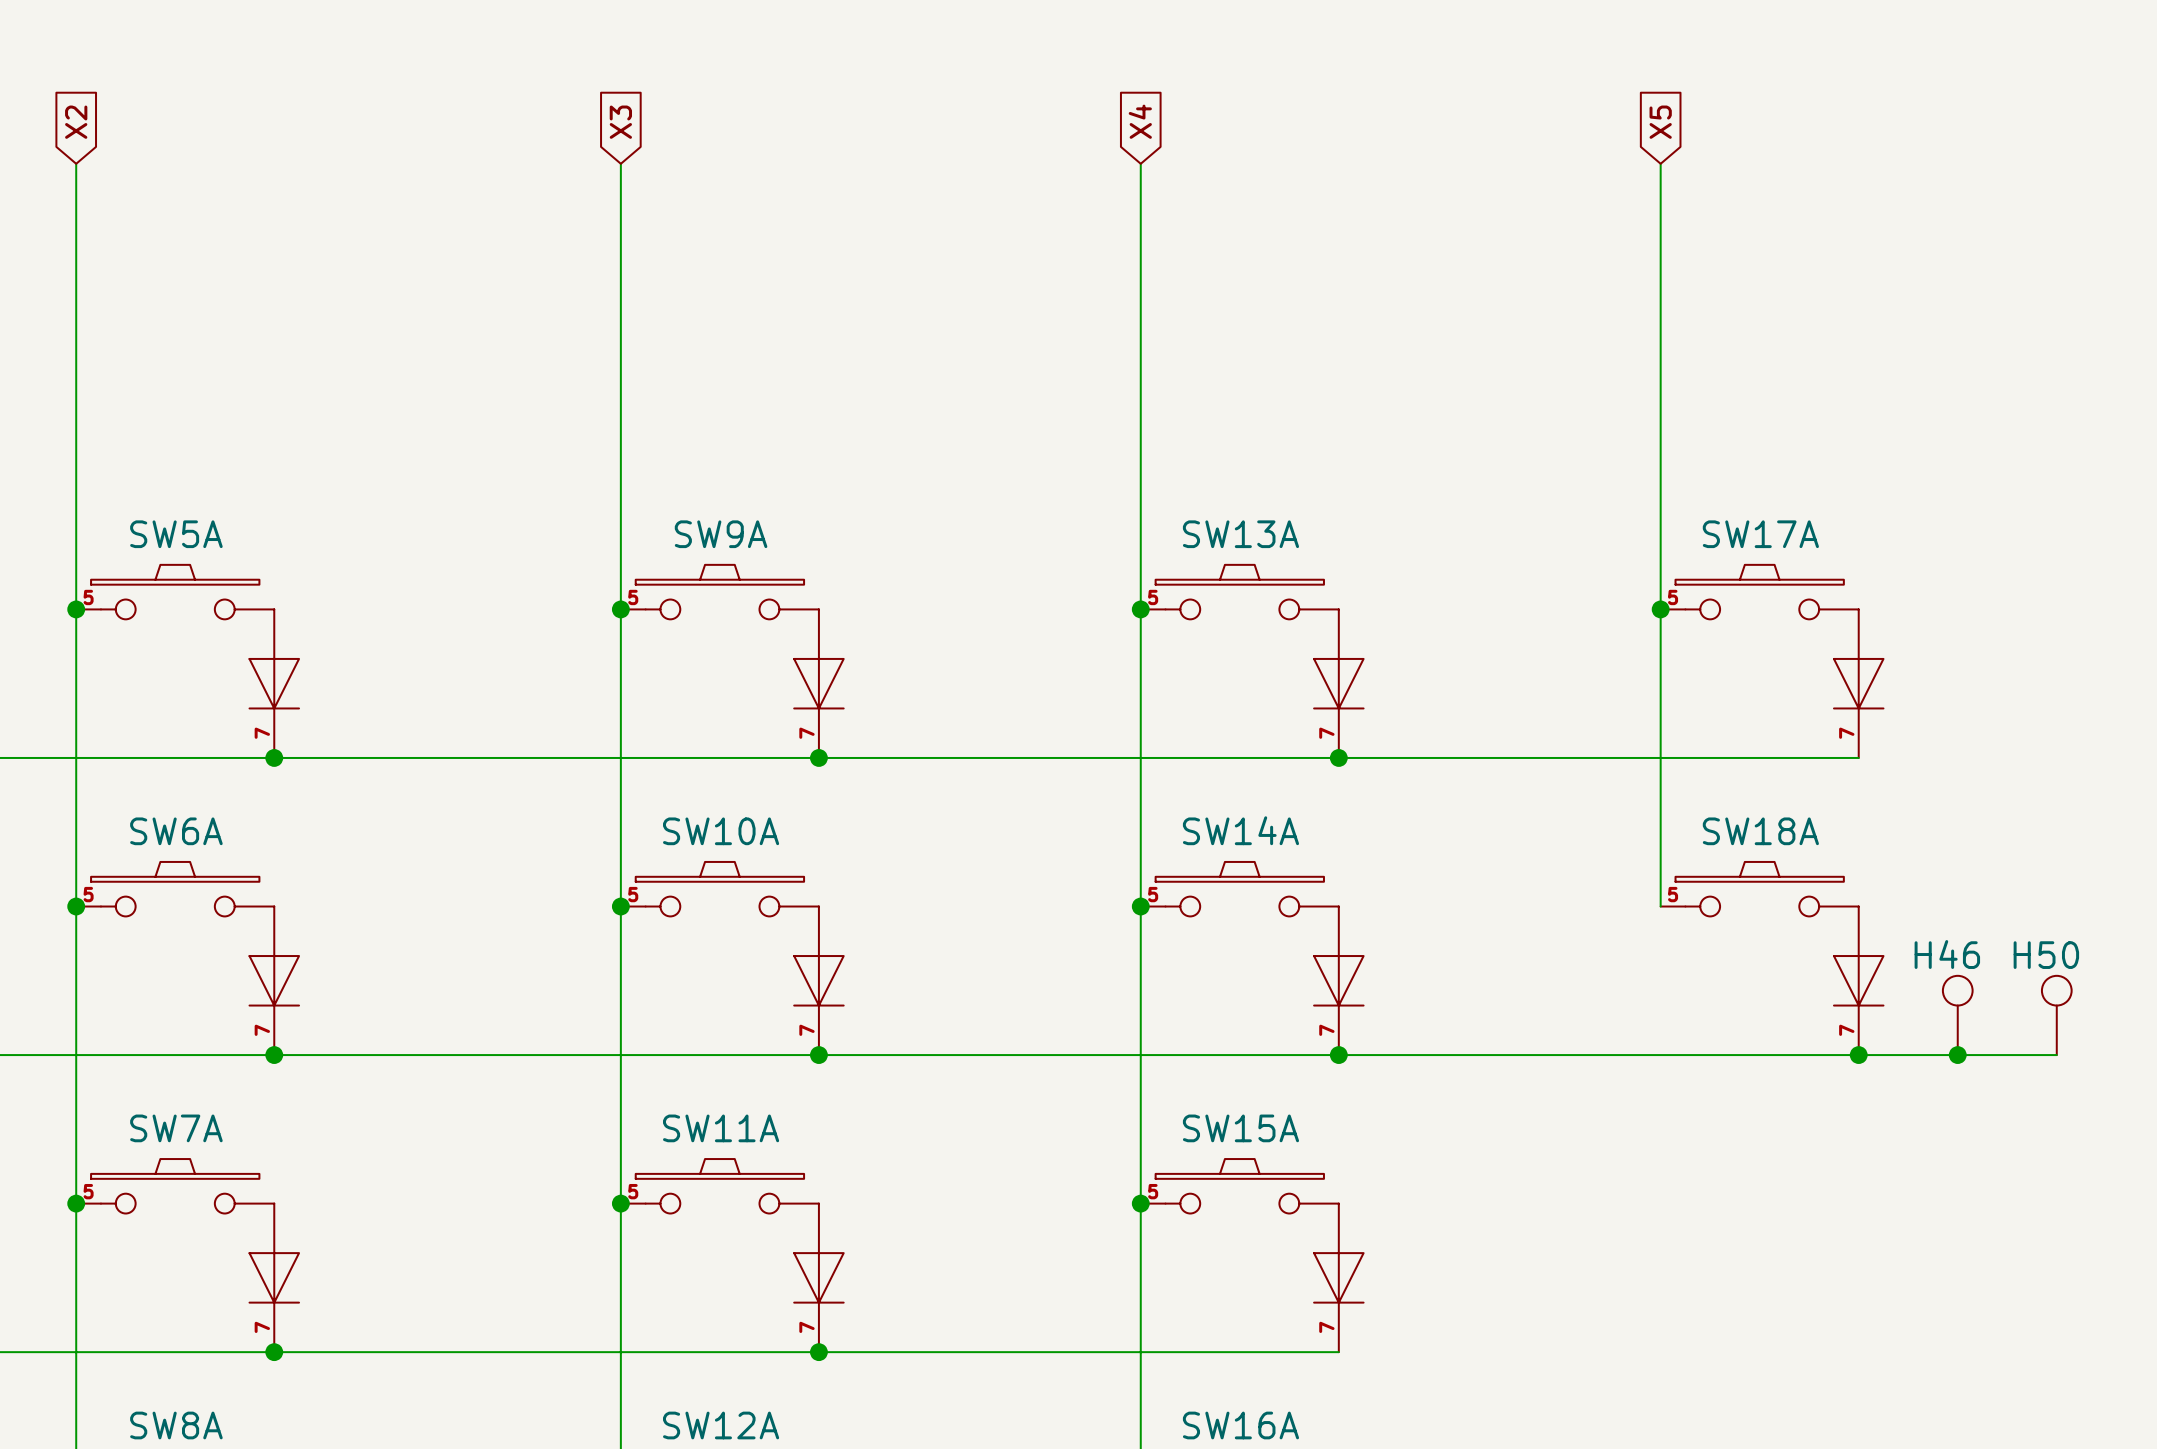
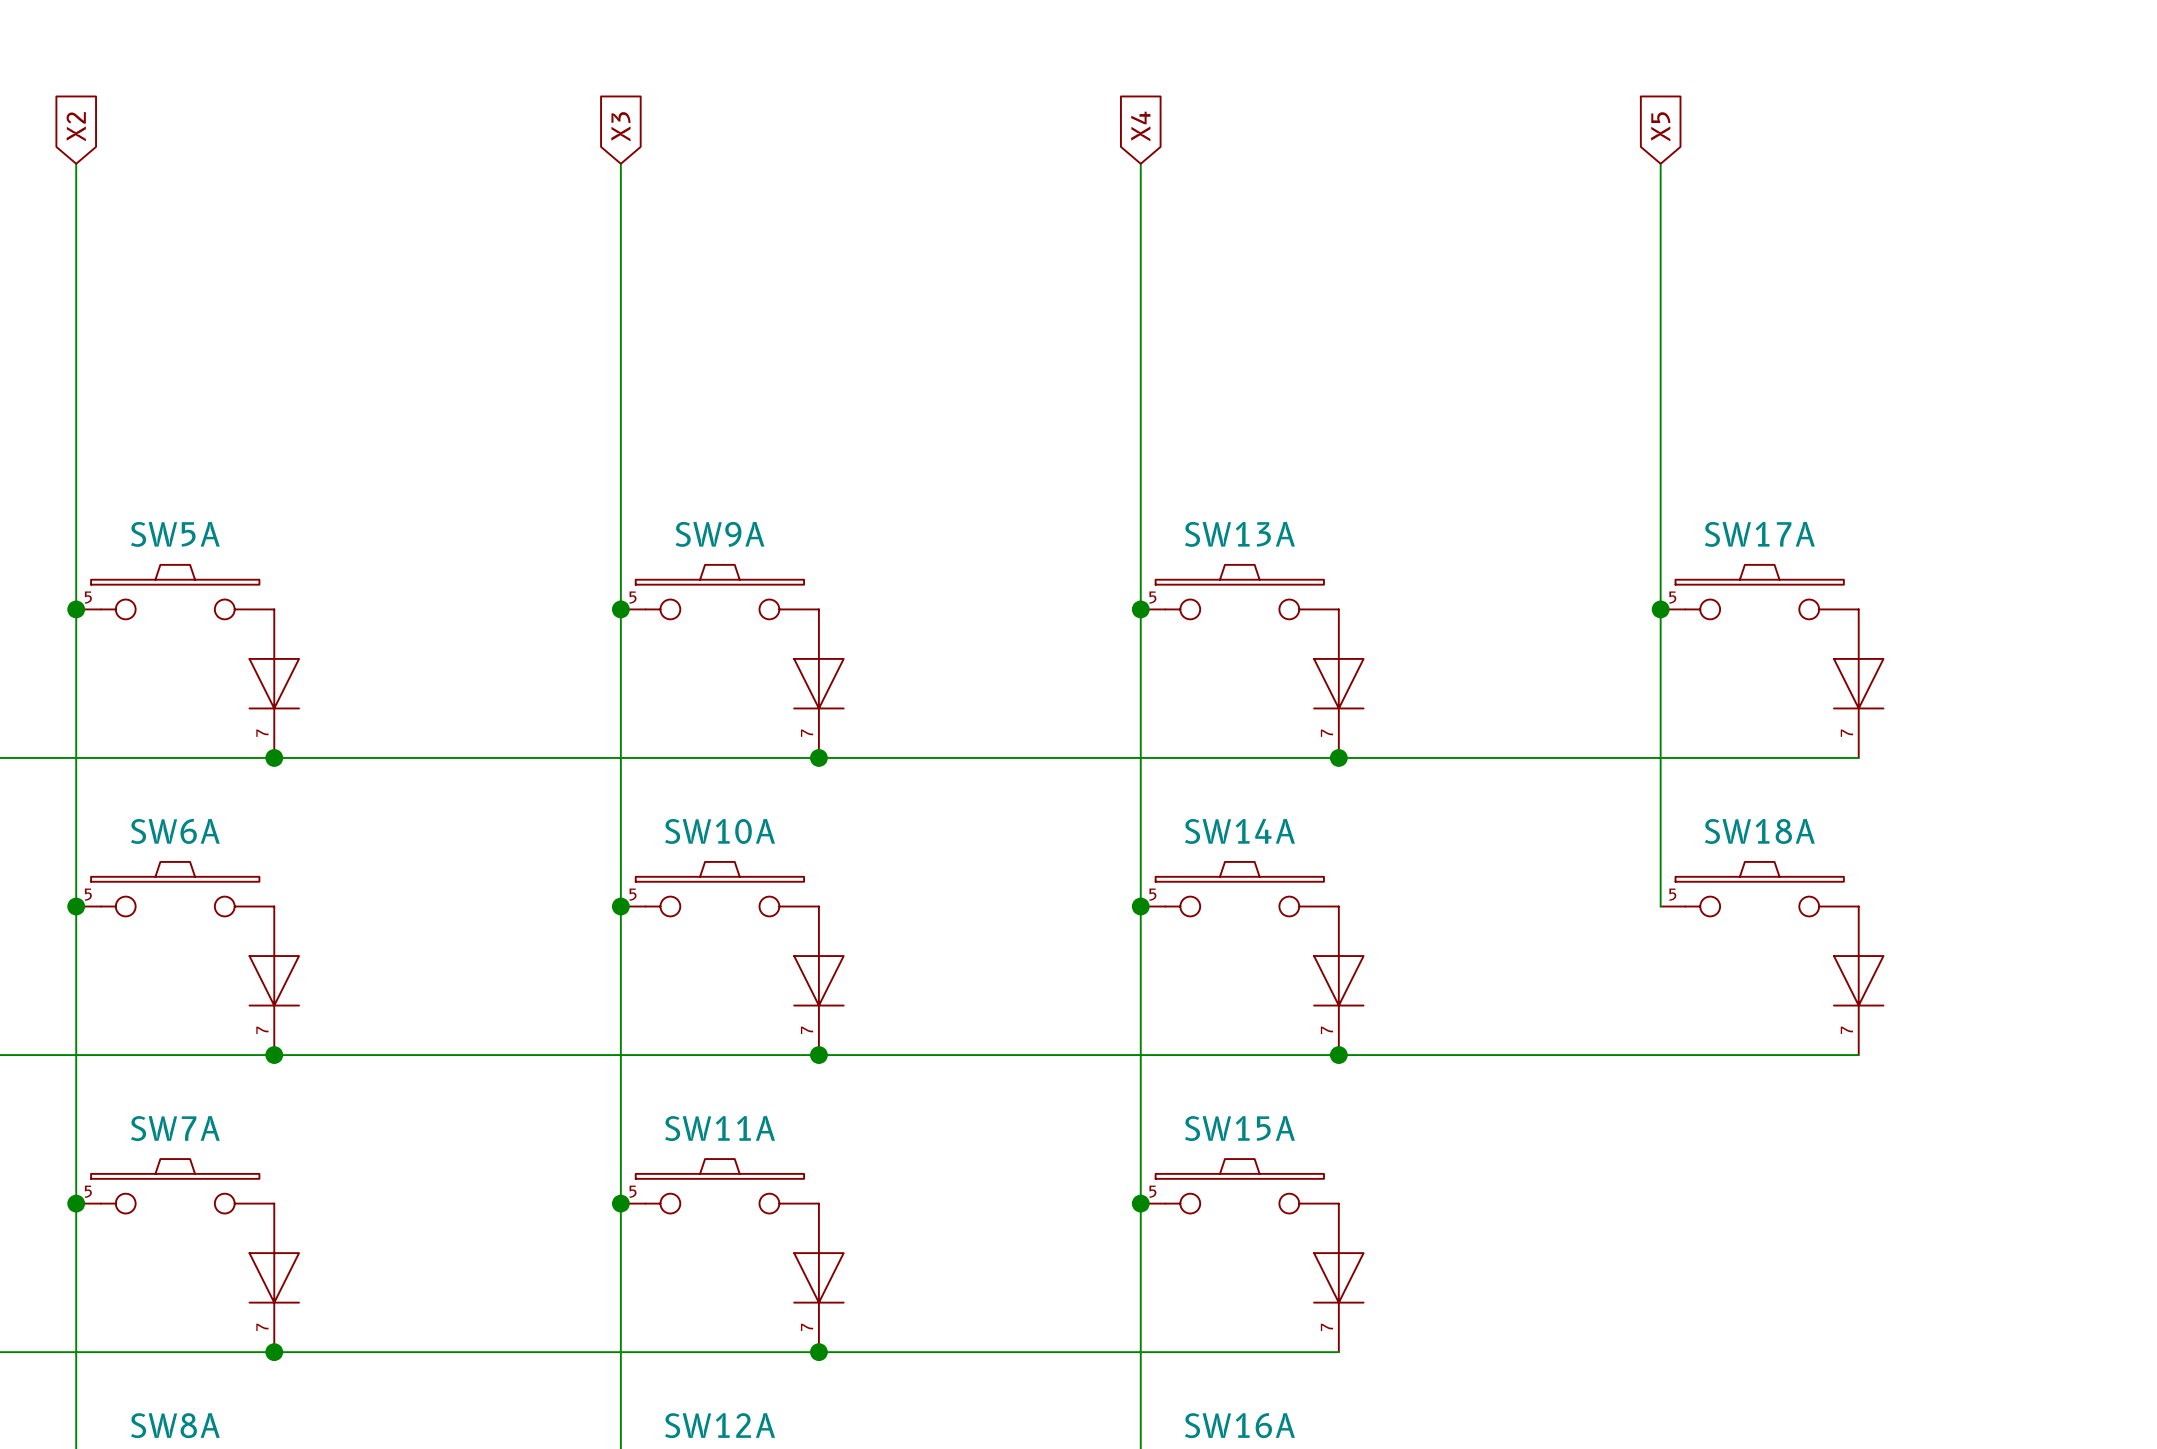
H46: (1957, 1015) -> none
H50: (2056, 1015) -> none
wire: (1858, 1055) (2056, 1055) -> none
junction: (1858, 1055) -> none
junction: (1957, 1055) -> none

